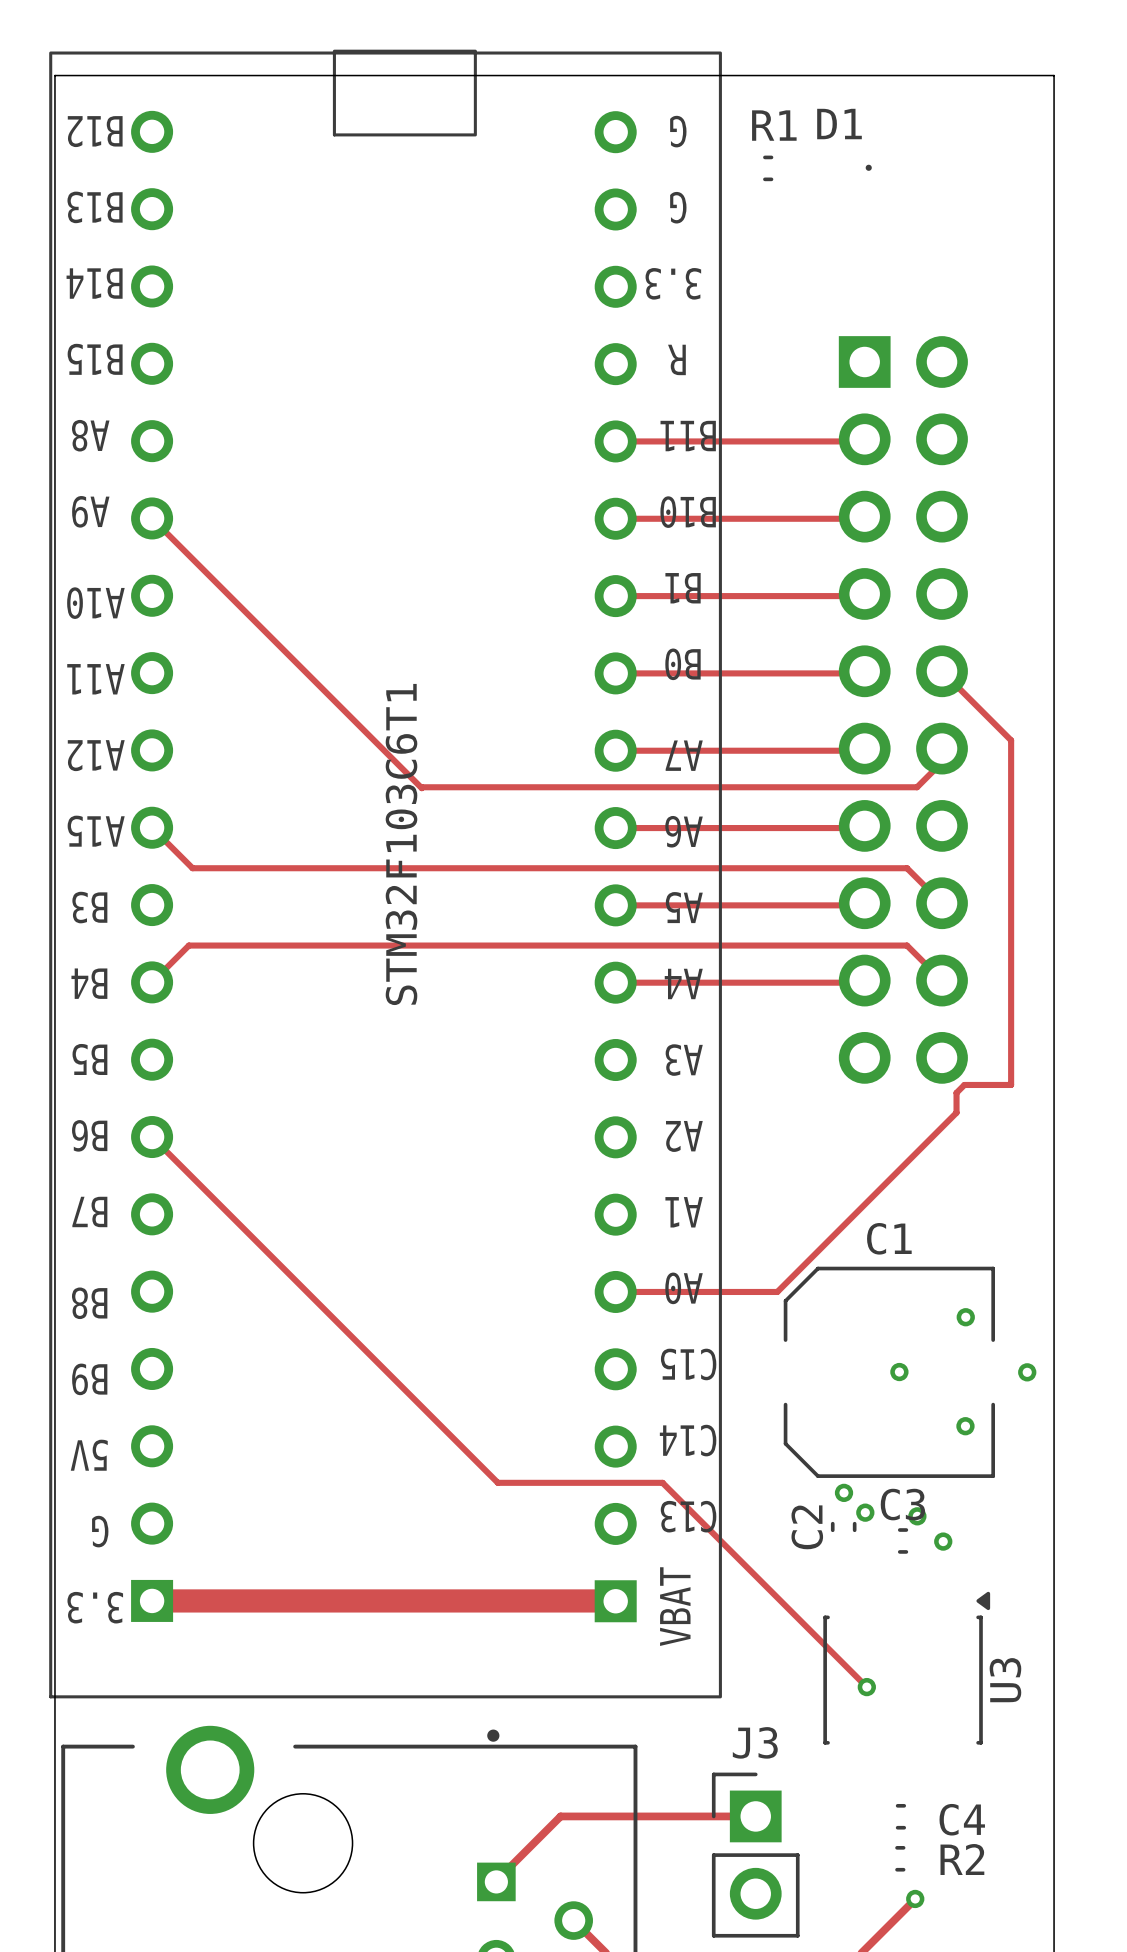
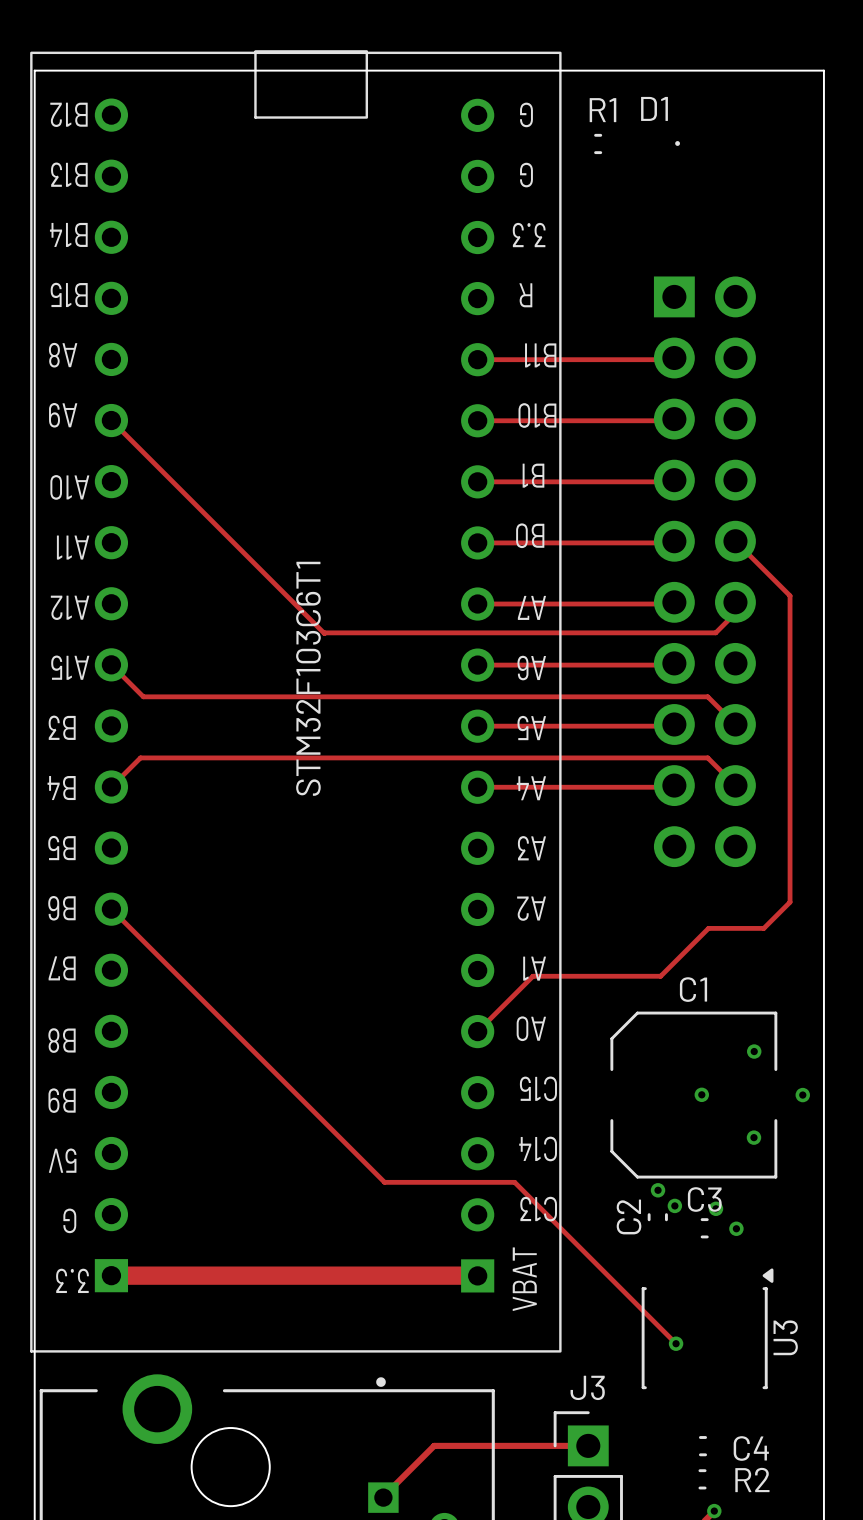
track: (1011, 1084) (964, 1084) (956, 1092) (956, 1112) (907, 1161) -> (790, 868) (790, 902) (763, 928) (708, 928)
track: (847, 1221) (777, 1291) (615, 1291) -> (660, 976) (532, 976) (477, 1031)

